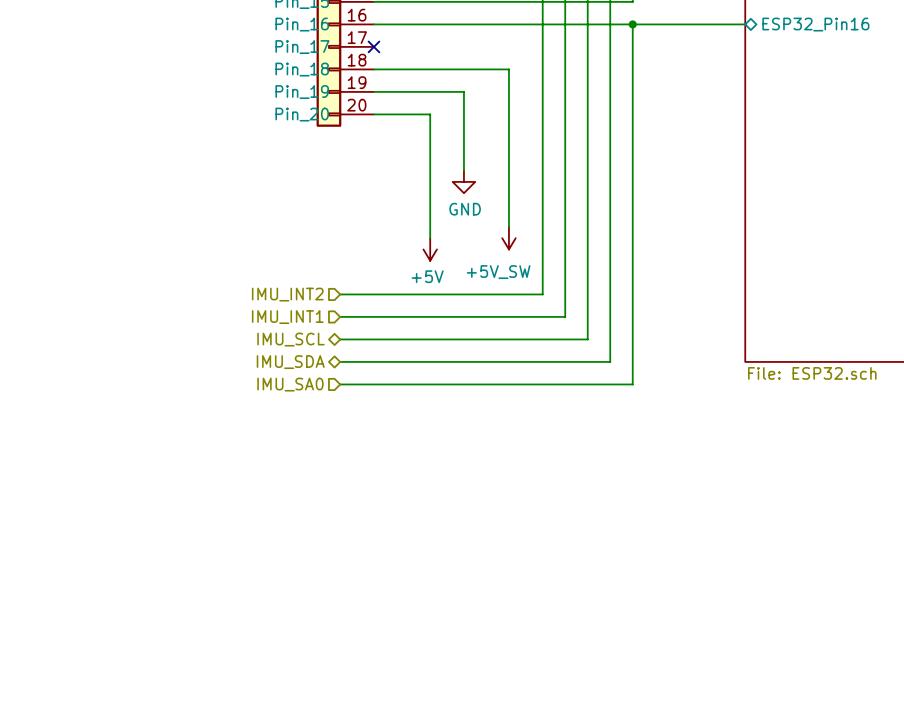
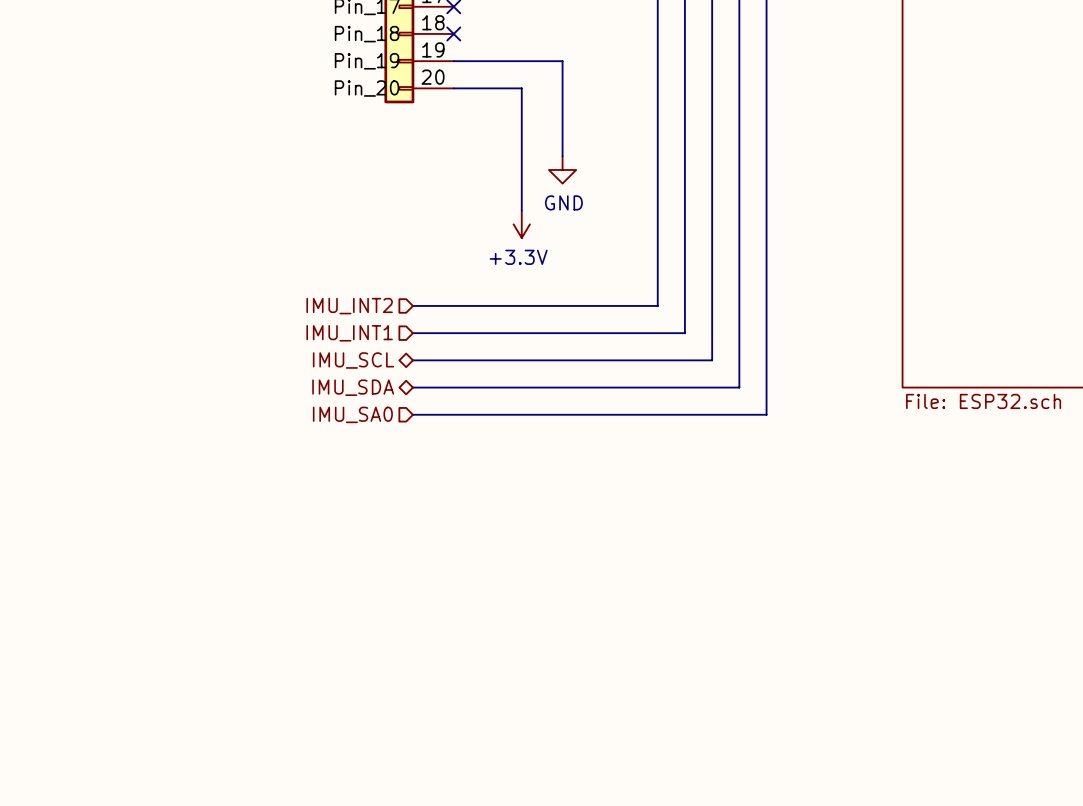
wire: (373, 69) (508, 69) (508, 226) -> none
no-connect mark: none -> (453, 33)
power symbol: none -> +3.3V (521, 224)
power symbol: +5V_SW (508, 238) -> none
power symbol: +5V (430, 249) -> none

